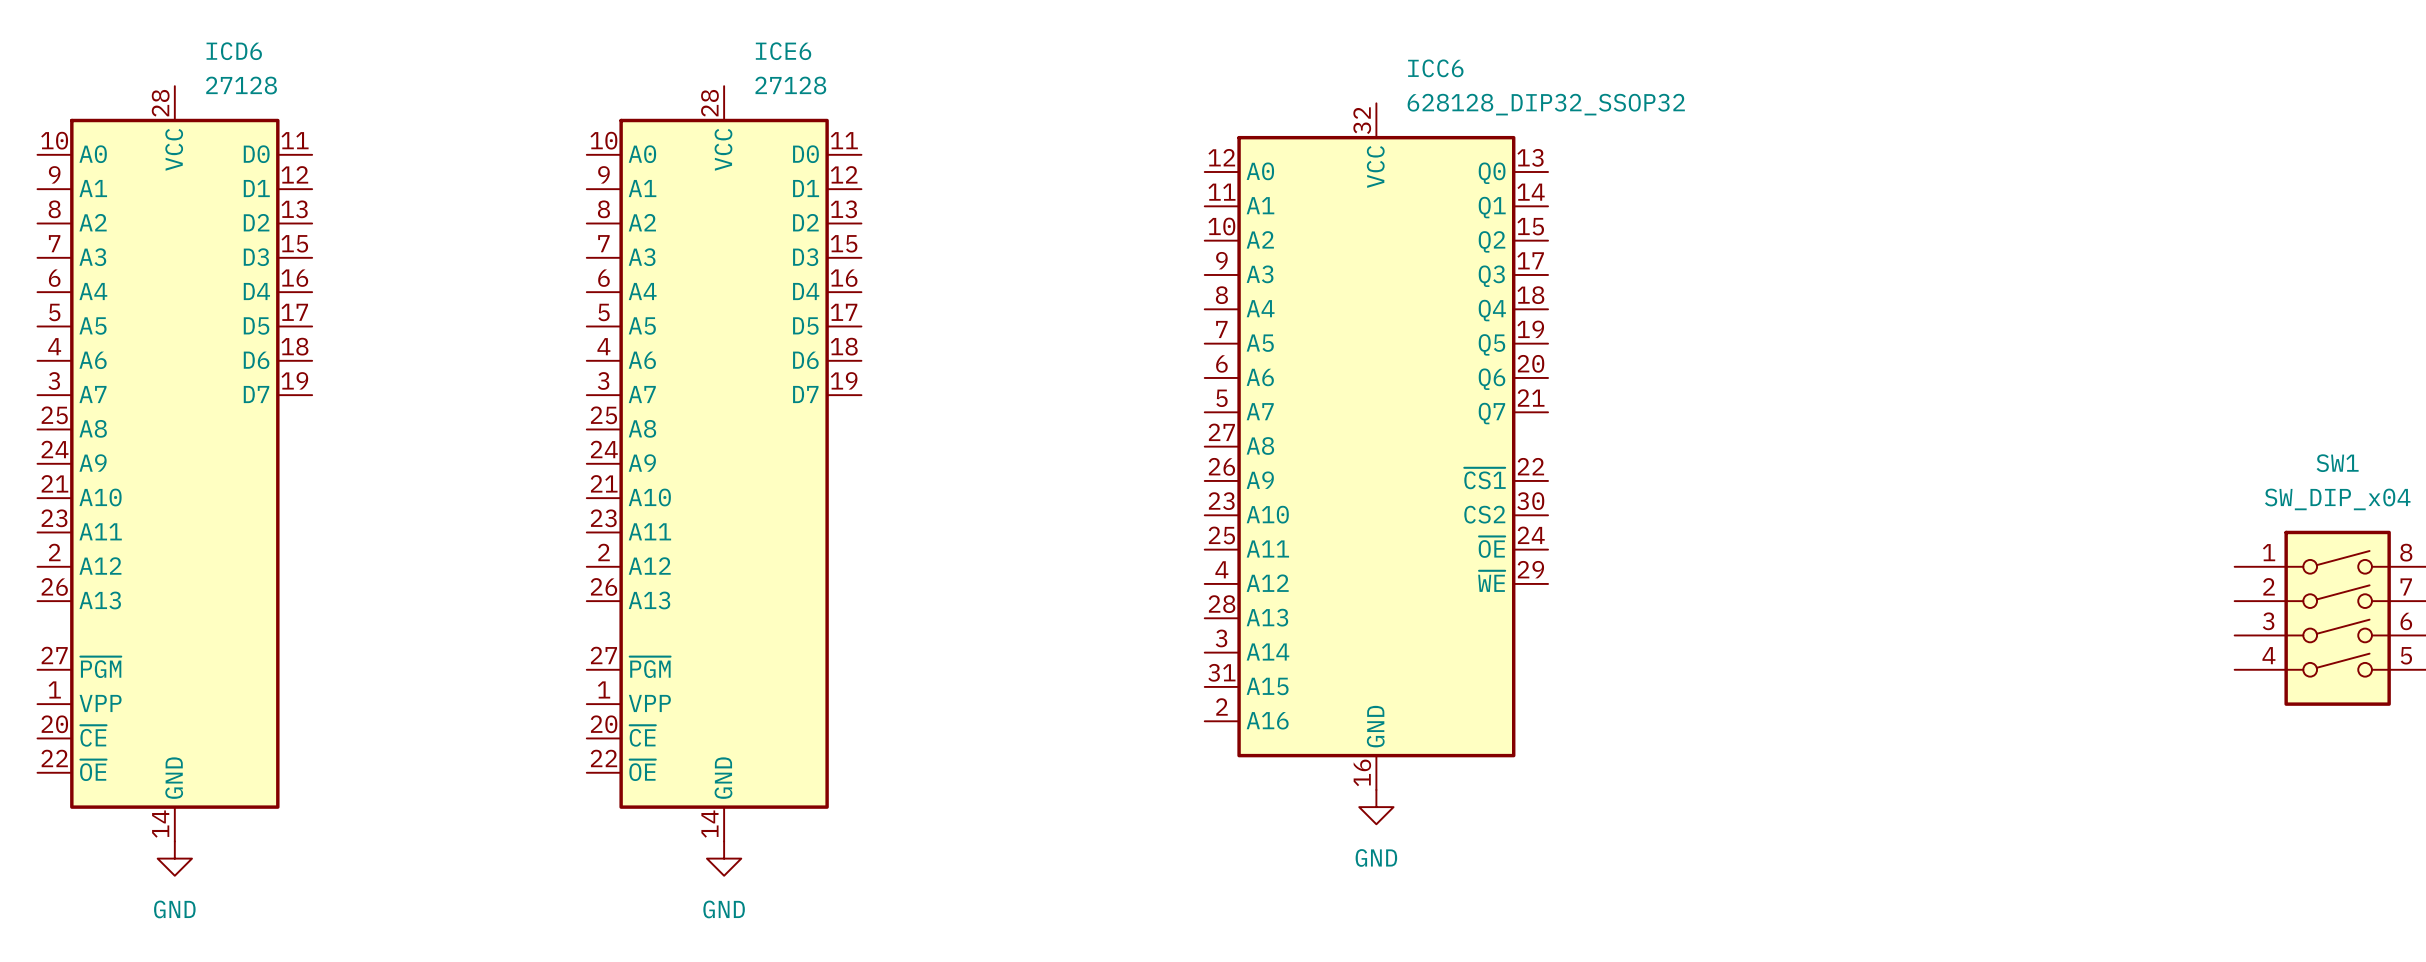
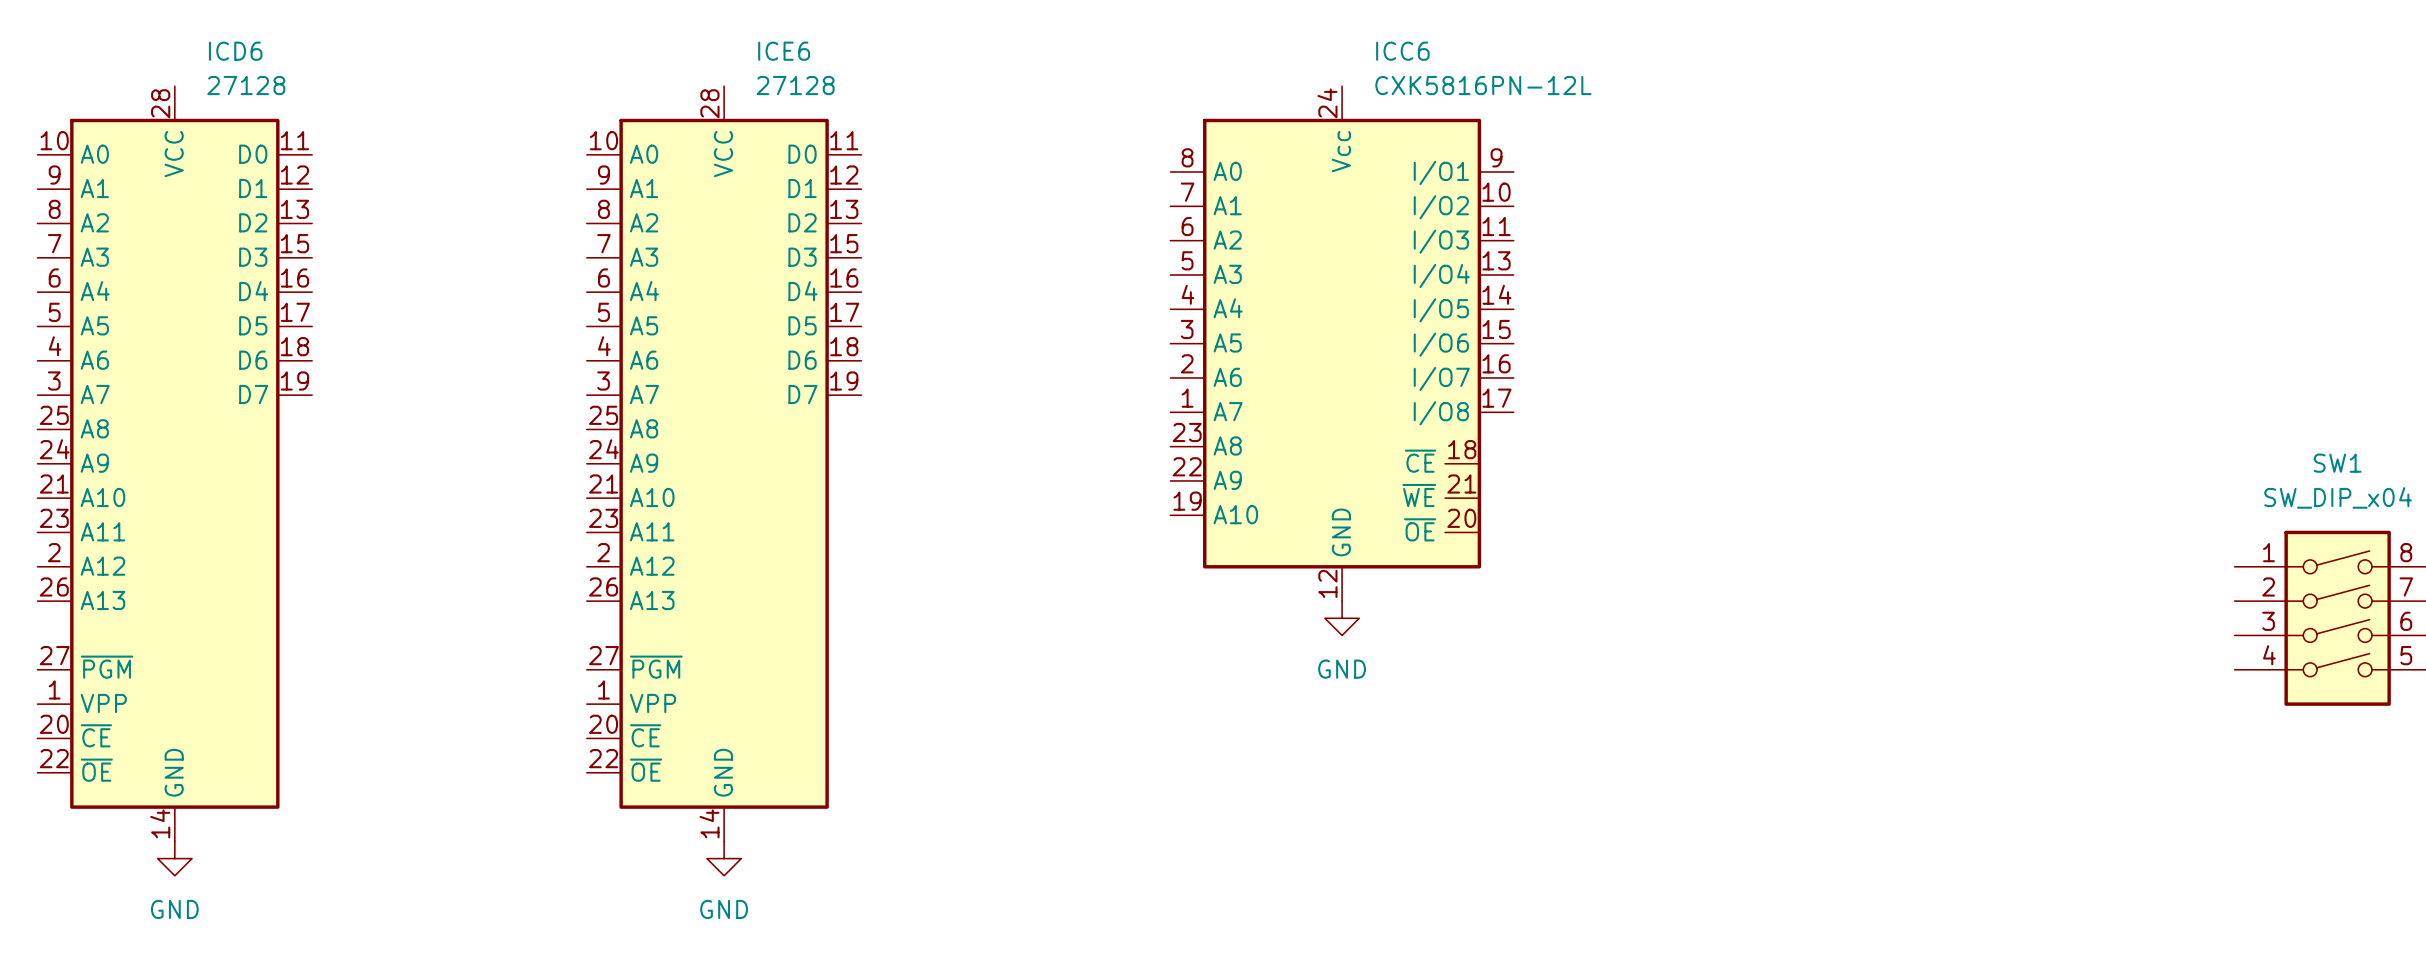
ICC6 name position: ICC6 (1435, 68) -> ICC6 (1402, 51)
ICC6 symbol: [1204, 103, 1549, 790] -> [1170, 86, 1514, 602]
ICC6 value: 628128_DIP32_SSOP32 (1546, 104) -> CXK5816PN-12L (1483, 85)
power symbol position: GND (1376, 807) -> GND (1342, 618)

